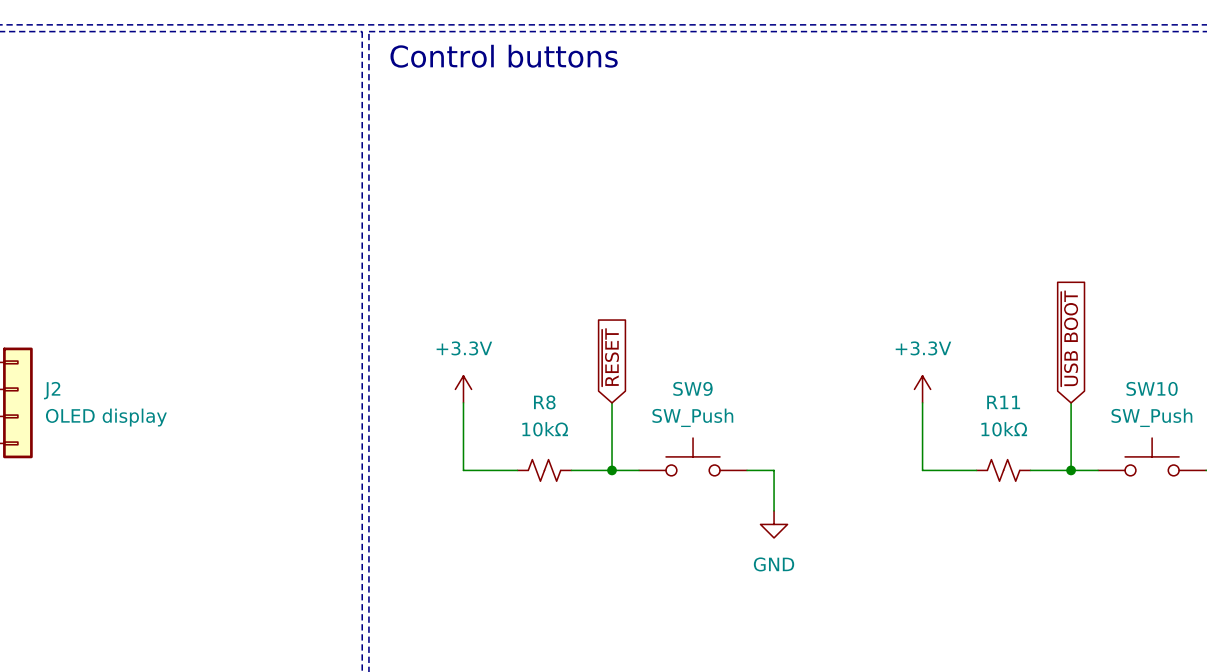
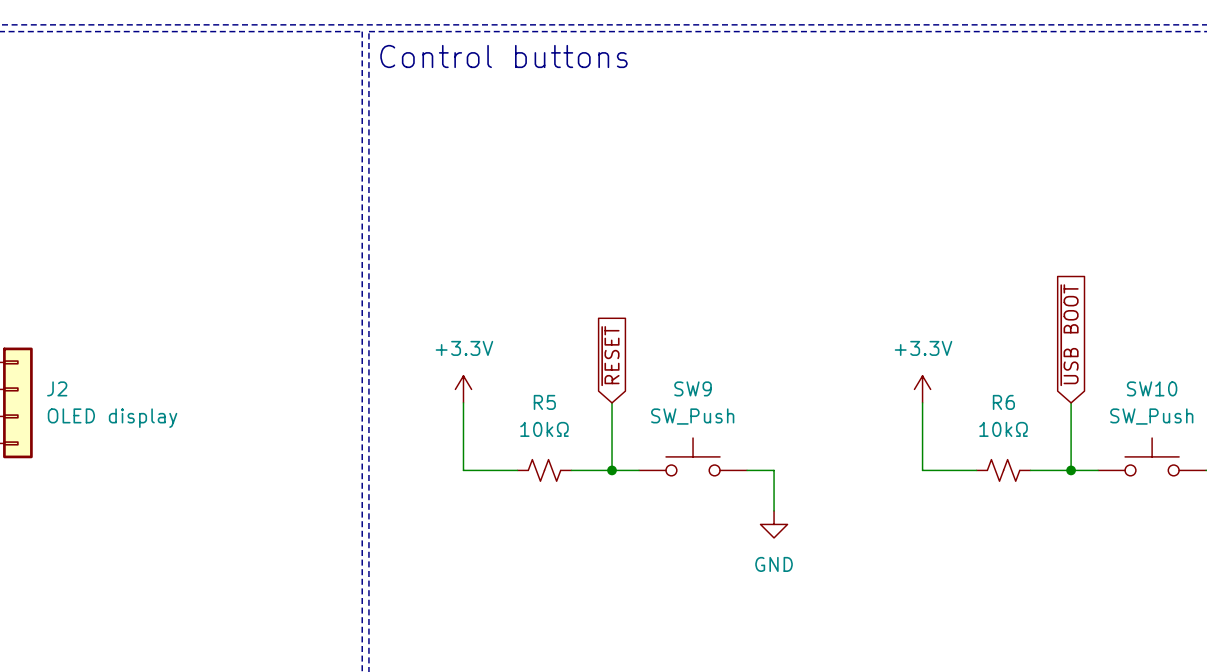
R8 name: R8 (544, 402) -> R5 (544, 402)
R11 name: R11 (1003, 402) -> R6 (1003, 402)

